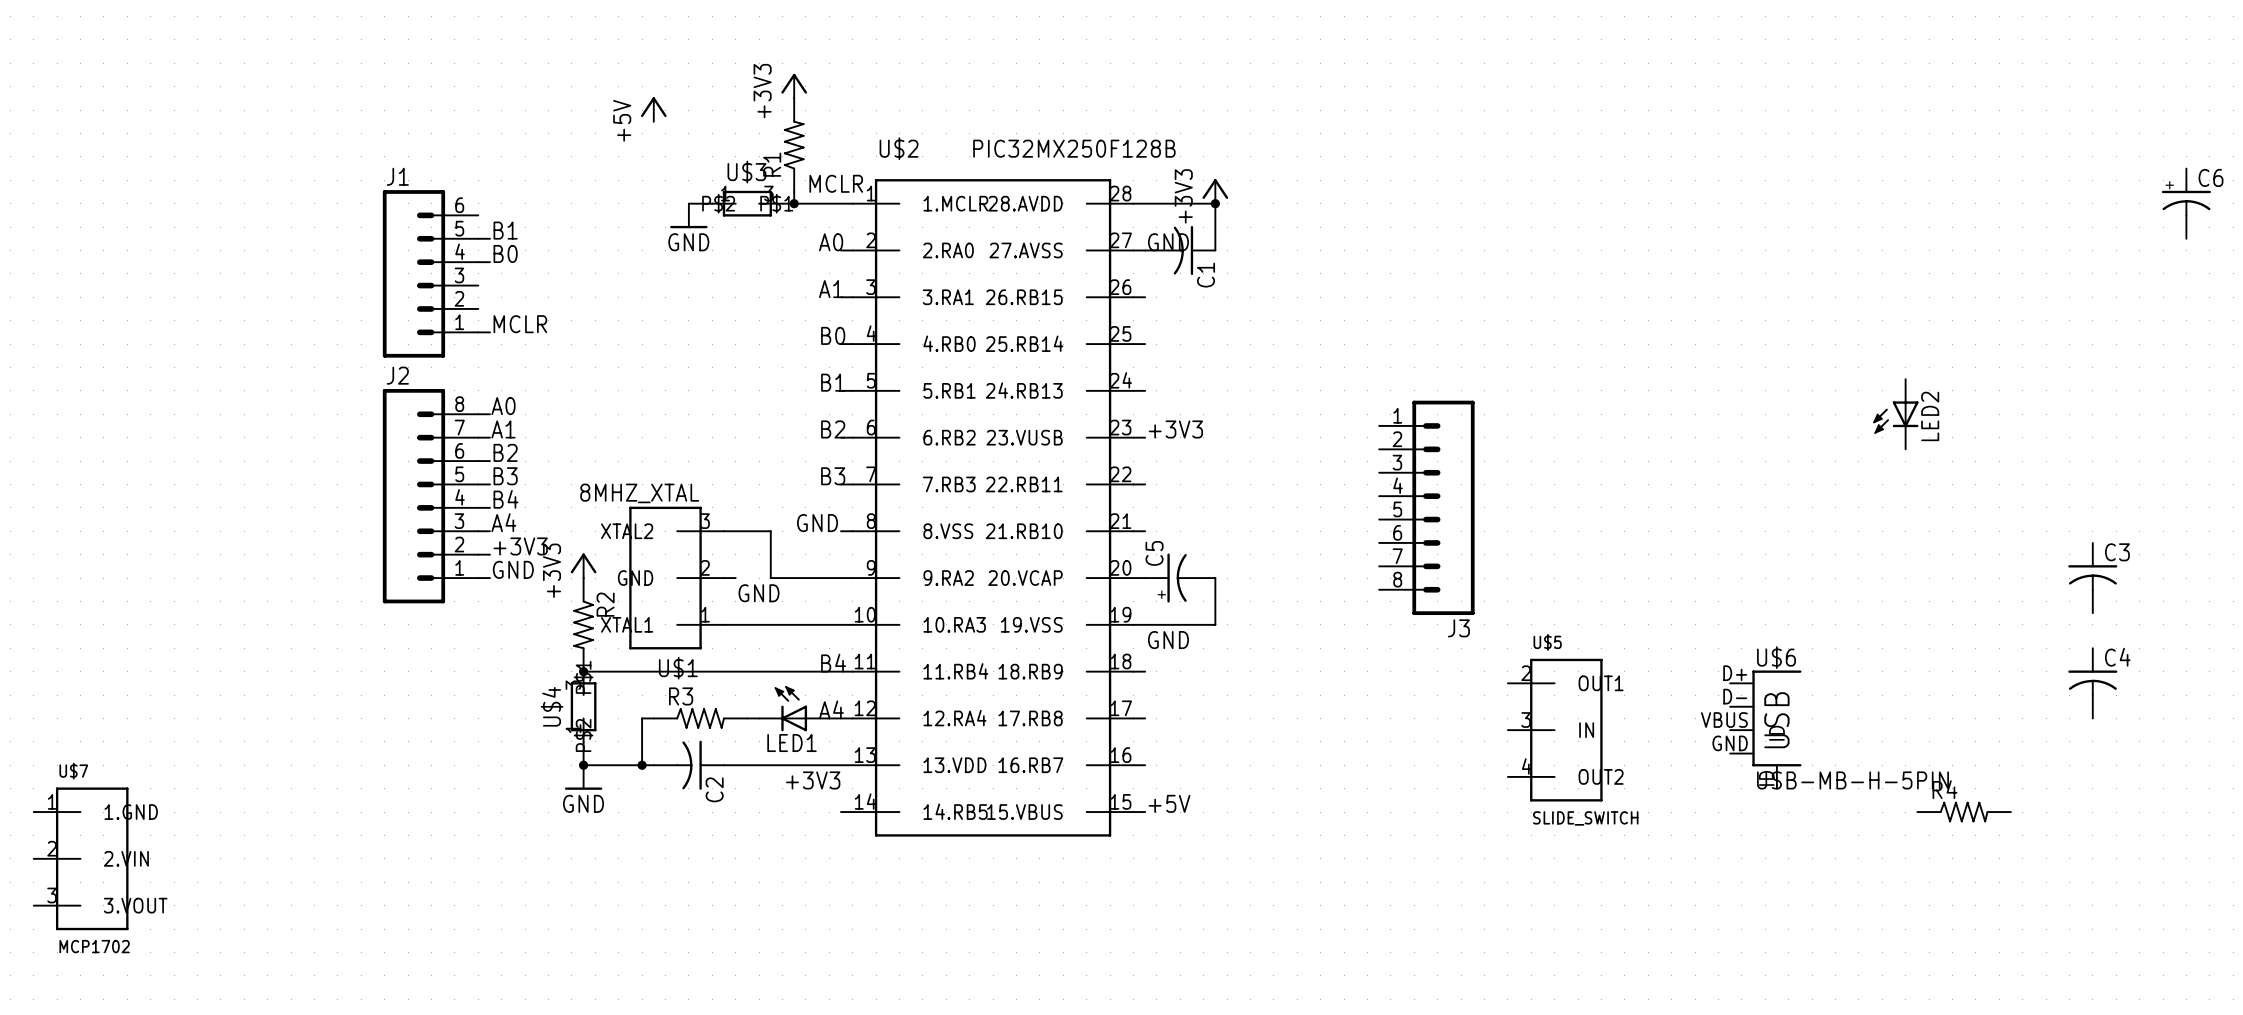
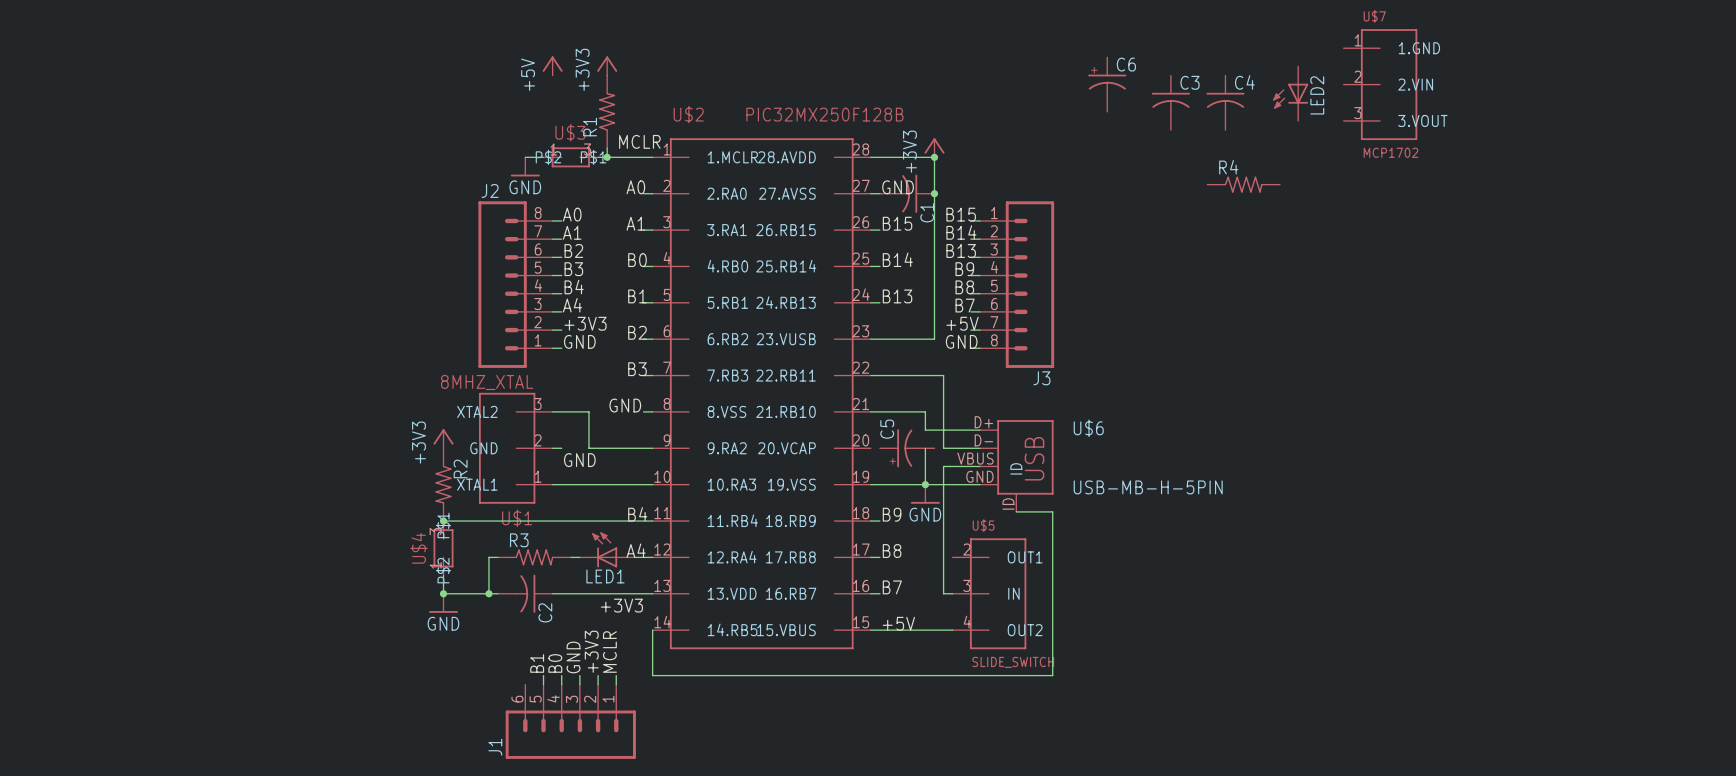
power symbol position: +5V (653, 109) -> +5V (552, 65)
C6 position: (2186, 203) -> (1107, 84)
label: B1 (505, 230) -> none
wire: (478, 238) (490, 238) -> none
wire: none -> (934, 193) (934, 339) (879, 339)
junction: none -> (934, 193)
label: B0 (505, 253) -> none
wire: (478, 262) (490, 262) -> none
J1 rotation: 0° (413, 273) -> 90° counterclockwise (570, 734)
J1 position: (430, 273) -> (570, 721)
label: none -> A0 (572, 214)
label: none -> B15 (961, 214)
wire: none -> (552, 220) (561, 220)
wire: none -> (970, 220) (979, 220)
label: none -> B15 (897, 223)
label: none -> A1 (572, 232)
label: none -> B14 (961, 232)
wire: none -> (552, 239) (561, 239)
wire: none -> (970, 239) (979, 239)
label: MCLR (520, 324) -> none
label: none -> B2 (573, 250)
label: none -> B13 (961, 250)
wire: (478, 332) (490, 332) -> none
wire: none -> (552, 257) (561, 257)
wire: none -> (970, 257) (979, 257)
label: none -> B14 (897, 259)
label: none -> B3 (573, 269)
label: none -> B9 (964, 269)
wire: none -> (552, 275) (561, 275)
wire: none -> (970, 275) (979, 275)
label: none -> B4 (574, 287)
label: none -> B8 (964, 287)
wire: none -> (552, 293) (561, 293)
wire: none -> (970, 293) (979, 293)
label: none -> B13 (897, 296)
label: none -> A4 (572, 305)
label: none -> B7 (965, 305)
wire: none -> (552, 311) (561, 311)
wire: none -> (970, 311) (979, 311)
label: A0 (503, 406) -> none
wire: (478, 414) (490, 414) -> none
LED2 position: (1895, 414) -> (1290, 93)
label: none -> +3V3 (585, 323)
label: none -> +5V (962, 323)
wire: none -> (552, 330) (561, 330)
wire: none -> (970, 330) (979, 330)
label: A1 (503, 429) -> none
label: +3V3 (1175, 429) -> none
wire: (478, 437) (490, 437) -> none
label: none -> GND (579, 341)
wire: none -> (552, 348) (561, 348)
label: B2 (505, 452) -> none
wire: (478, 461) (490, 461) -> none
label: B3 (505, 476) -> none
wire: (478, 484) (490, 484) -> none
wire: none -> (879, 375) (943, 375) (943, 448) (979, 448)
J2 position: (430, 496) -> (515, 284)
label: B4 (505, 499) -> none
wire: (478, 507) (490, 507) -> none
J3 position: (1426, 507) -> (1017, 284)
label: A4 (503, 522) -> none
wire: (478, 531) (490, 531) -> none
wire: none -> (879, 411) (925, 411) (925, 430) (979, 430)
label: +3V3 (520, 546) -> none
wire: (478, 554) (490, 554) -> none
label: GND (513, 569) -> none
wire: (478, 578) (490, 578) -> none
wire: (1133, 578) (1145, 578) -> (970, 348) (979, 348)
wire: none -> (925, 448) (925, 484)
wire: (1215, 578) (1215, 624) -> (979, 484) (934, 484)
C3 position: (2092, 578) -> (1170, 102)
wire: none -> (979, 466) (943, 466) (943, 593) (952, 593)
junction: none -> (925, 484)
power symbol: none -> GND (925, 494)
label position: GND (1168, 640) -> GND (961, 341)
U$6 name position: U$6 (1776, 657) -> U$6 (1088, 428)
label: none -> B9 (892, 514)
U$6 symbol: [1730, 670, 1802, 789] -> [979, 420, 1054, 512]
C4 position: (2092, 683) -> (1225, 102)
label: none -> B8 (892, 551)
U$5 position: (1555, 730) -> (989, 593)
label: none -> B7 (892, 587)
U$6 value position: USB-MB-H-5PIN (1853, 780) -> USB-MB-H-5PIN (1148, 487)
wire: (840, 812) (852, 812) -> (1016, 511) (1052, 511) (1052, 675) (652, 675) (652, 630)
wire: none -> (879, 630) (952, 630)
R4 position: (1964, 812) -> (1243, 184)
label: none -> +3V3 (591, 651)
label: none -> MCLR (609, 652)
label: none -> GND (573, 657)
label: none -> B1 (537, 663)
label: none -> B0 (555, 663)
U$7 position: (81, 858) -> (1380, 84)
wire: none -> (543, 675) (543, 684)
wire: none -> (561, 675) (561, 684)
wire: none -> (579, 675) (579, 684)
wire: none -> (598, 675) (598, 684)
wire: none -> (616, 675) (616, 684)

